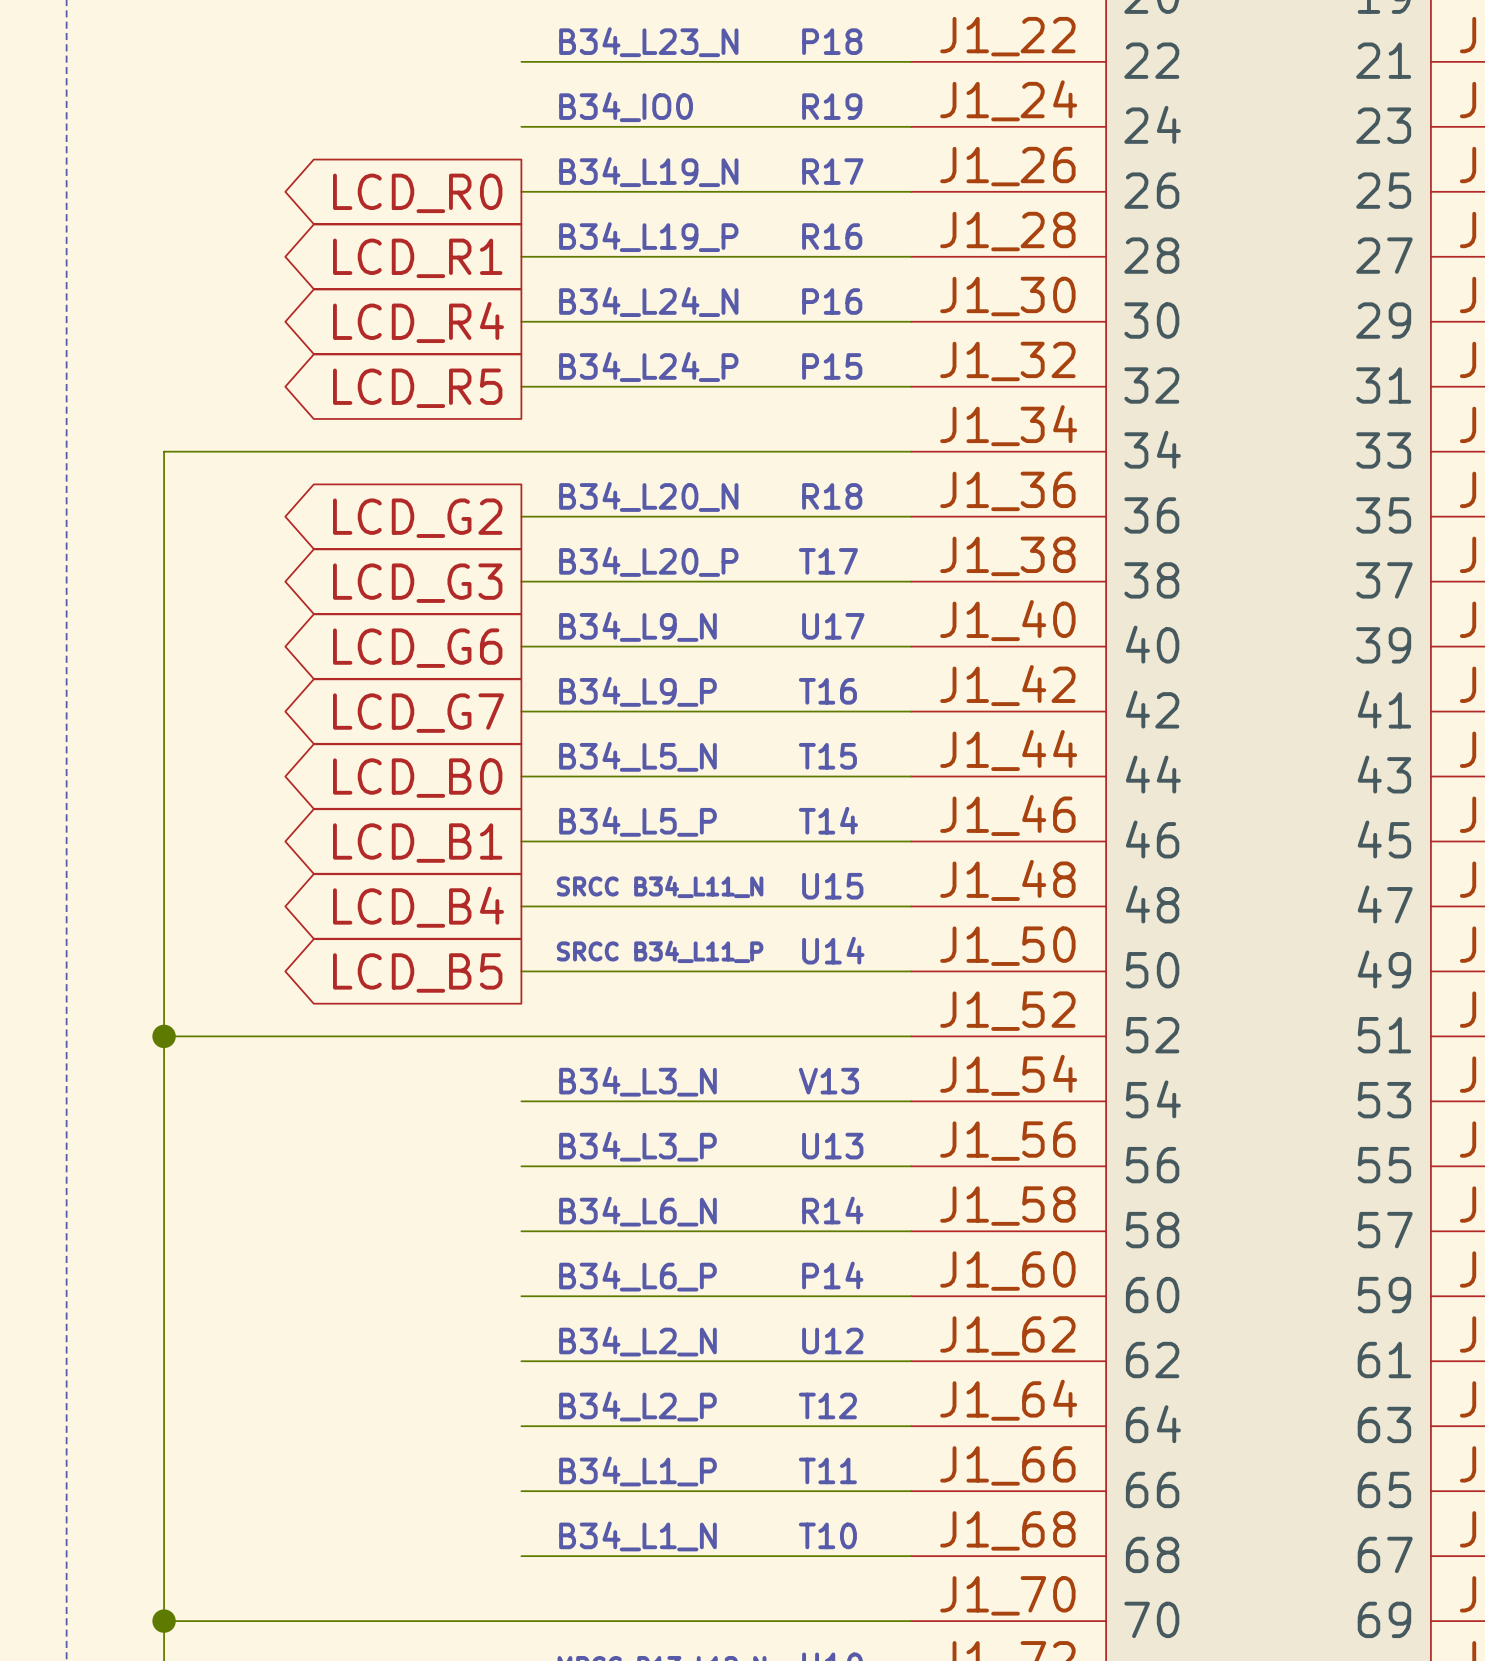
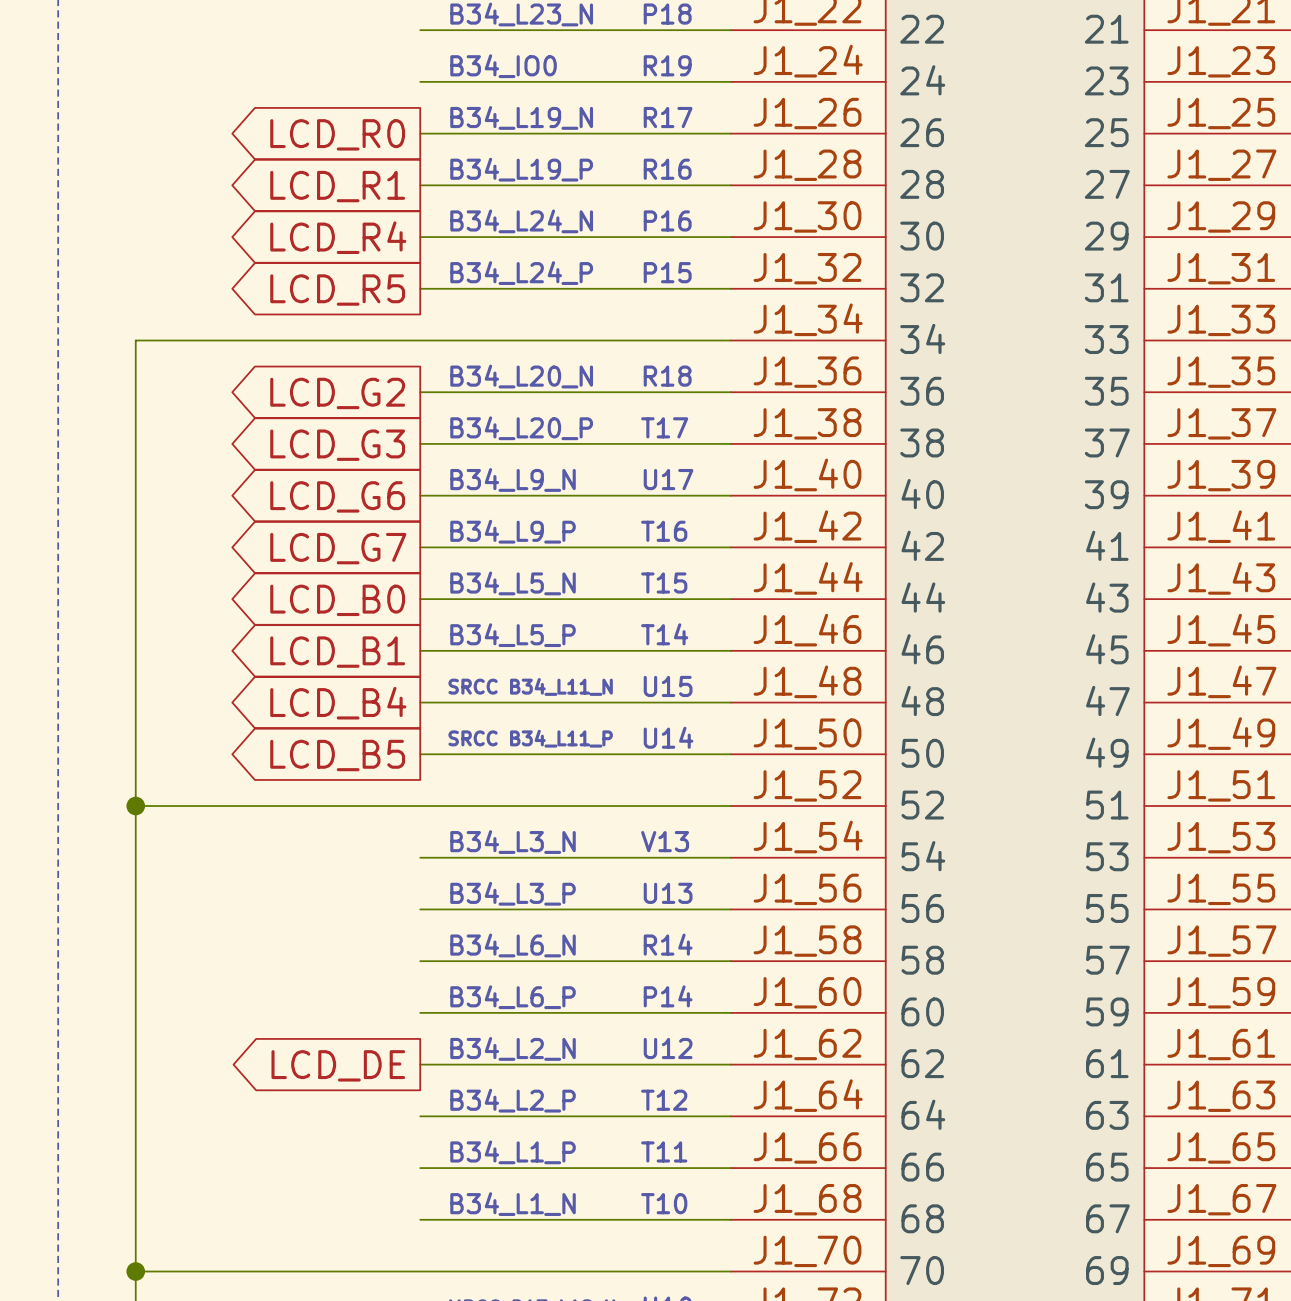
global label: none -> LCD_DE (338, 1065)

